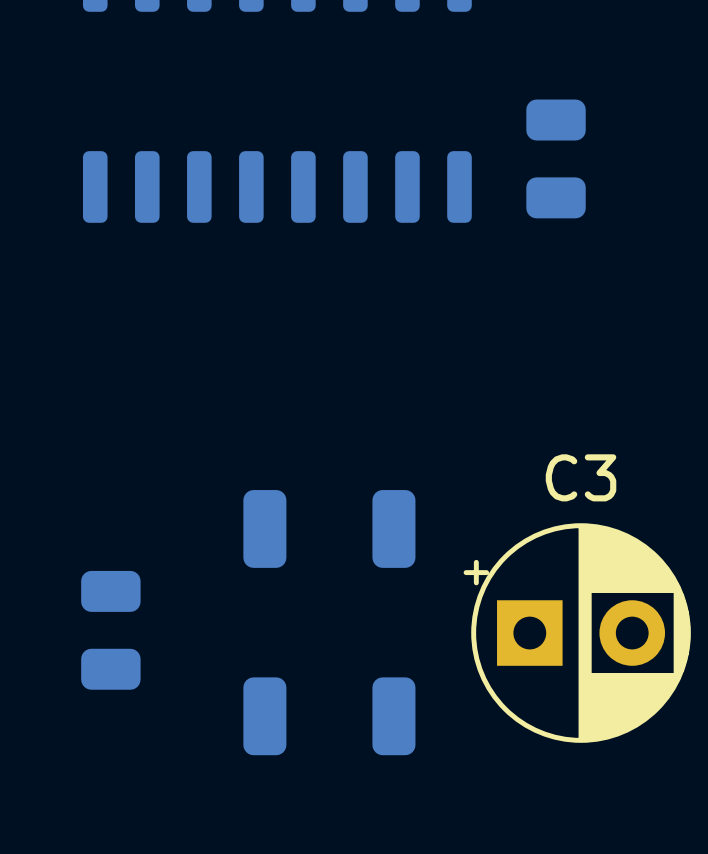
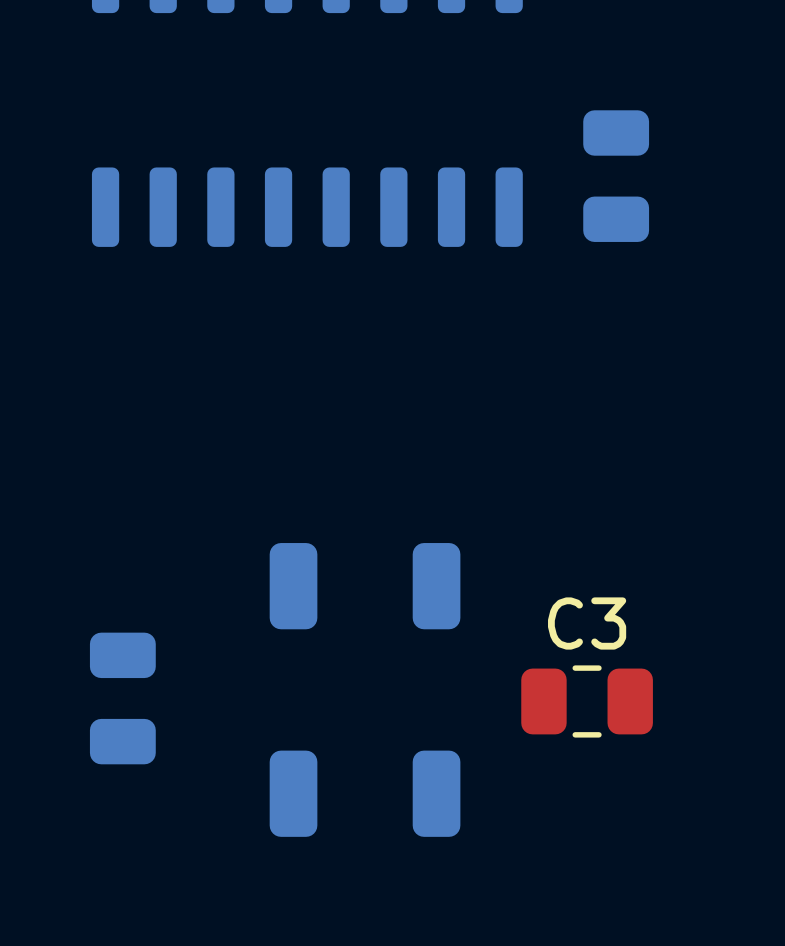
C3 name position: C3 (581, 477) -> C3 (587, 623)
C3 footprint: [463, 523, 691, 743] -> [521, 665, 653, 738]

